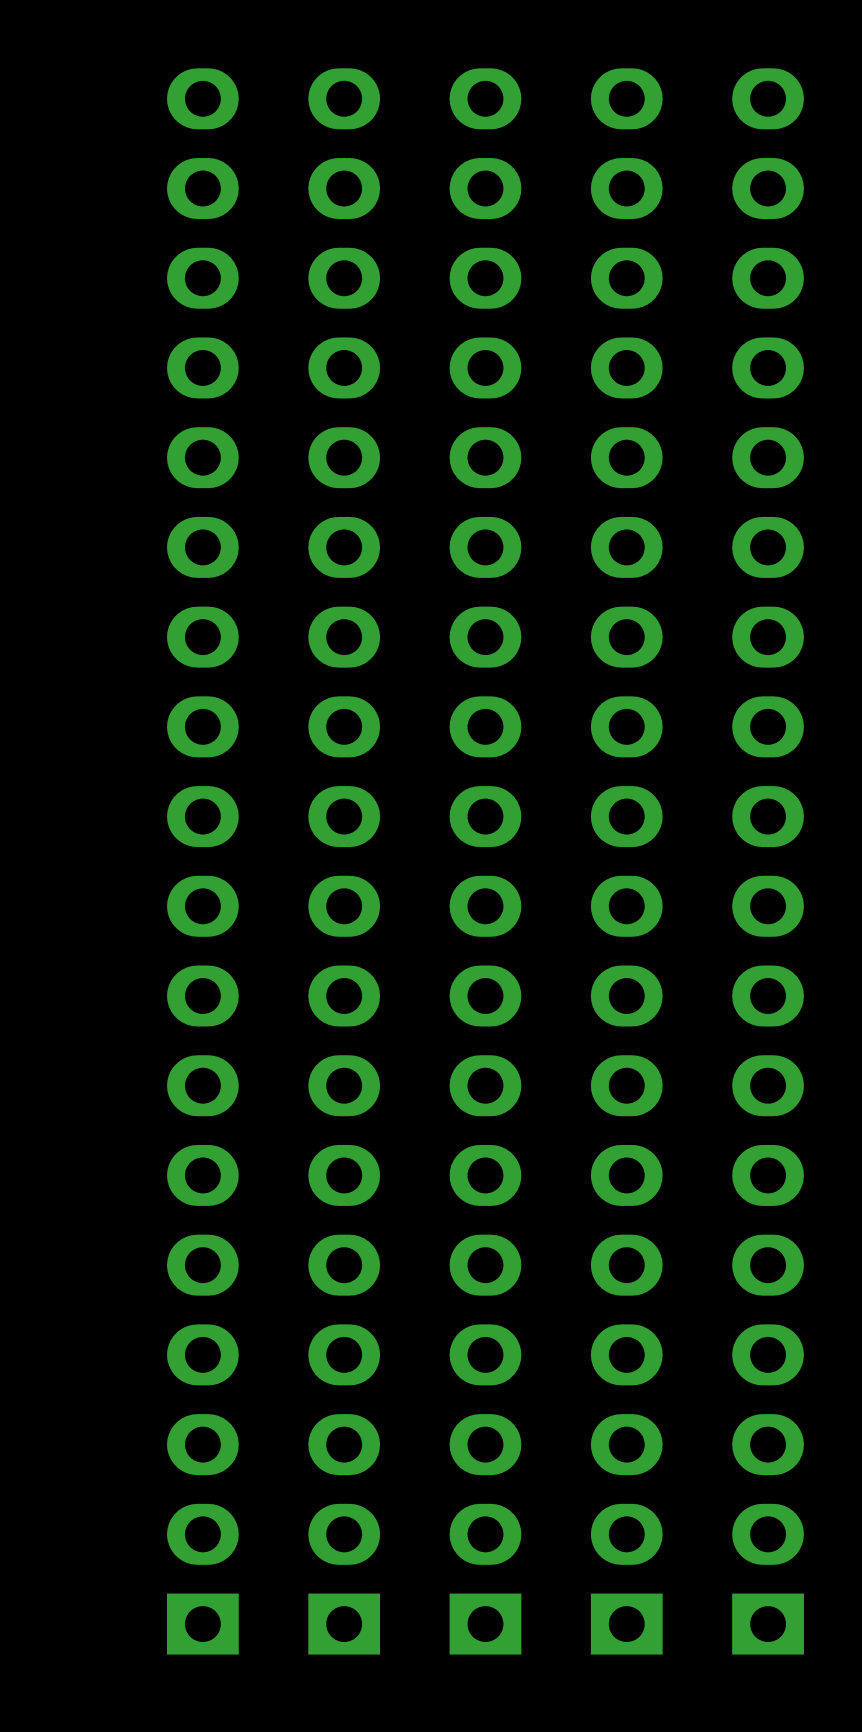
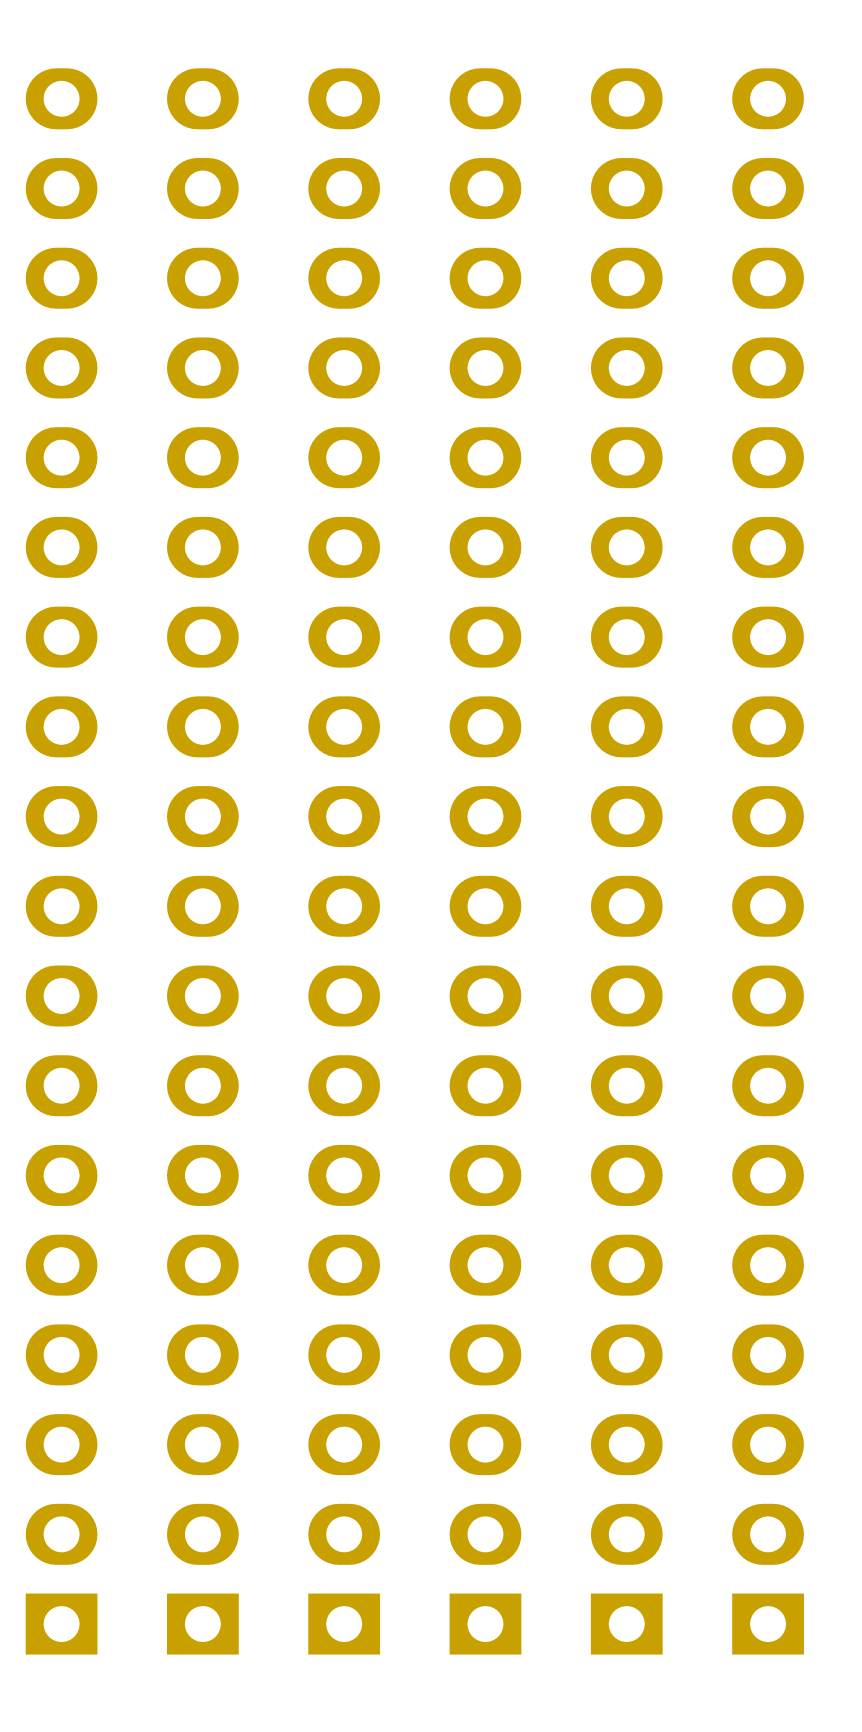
part: none -> (61, 861)

